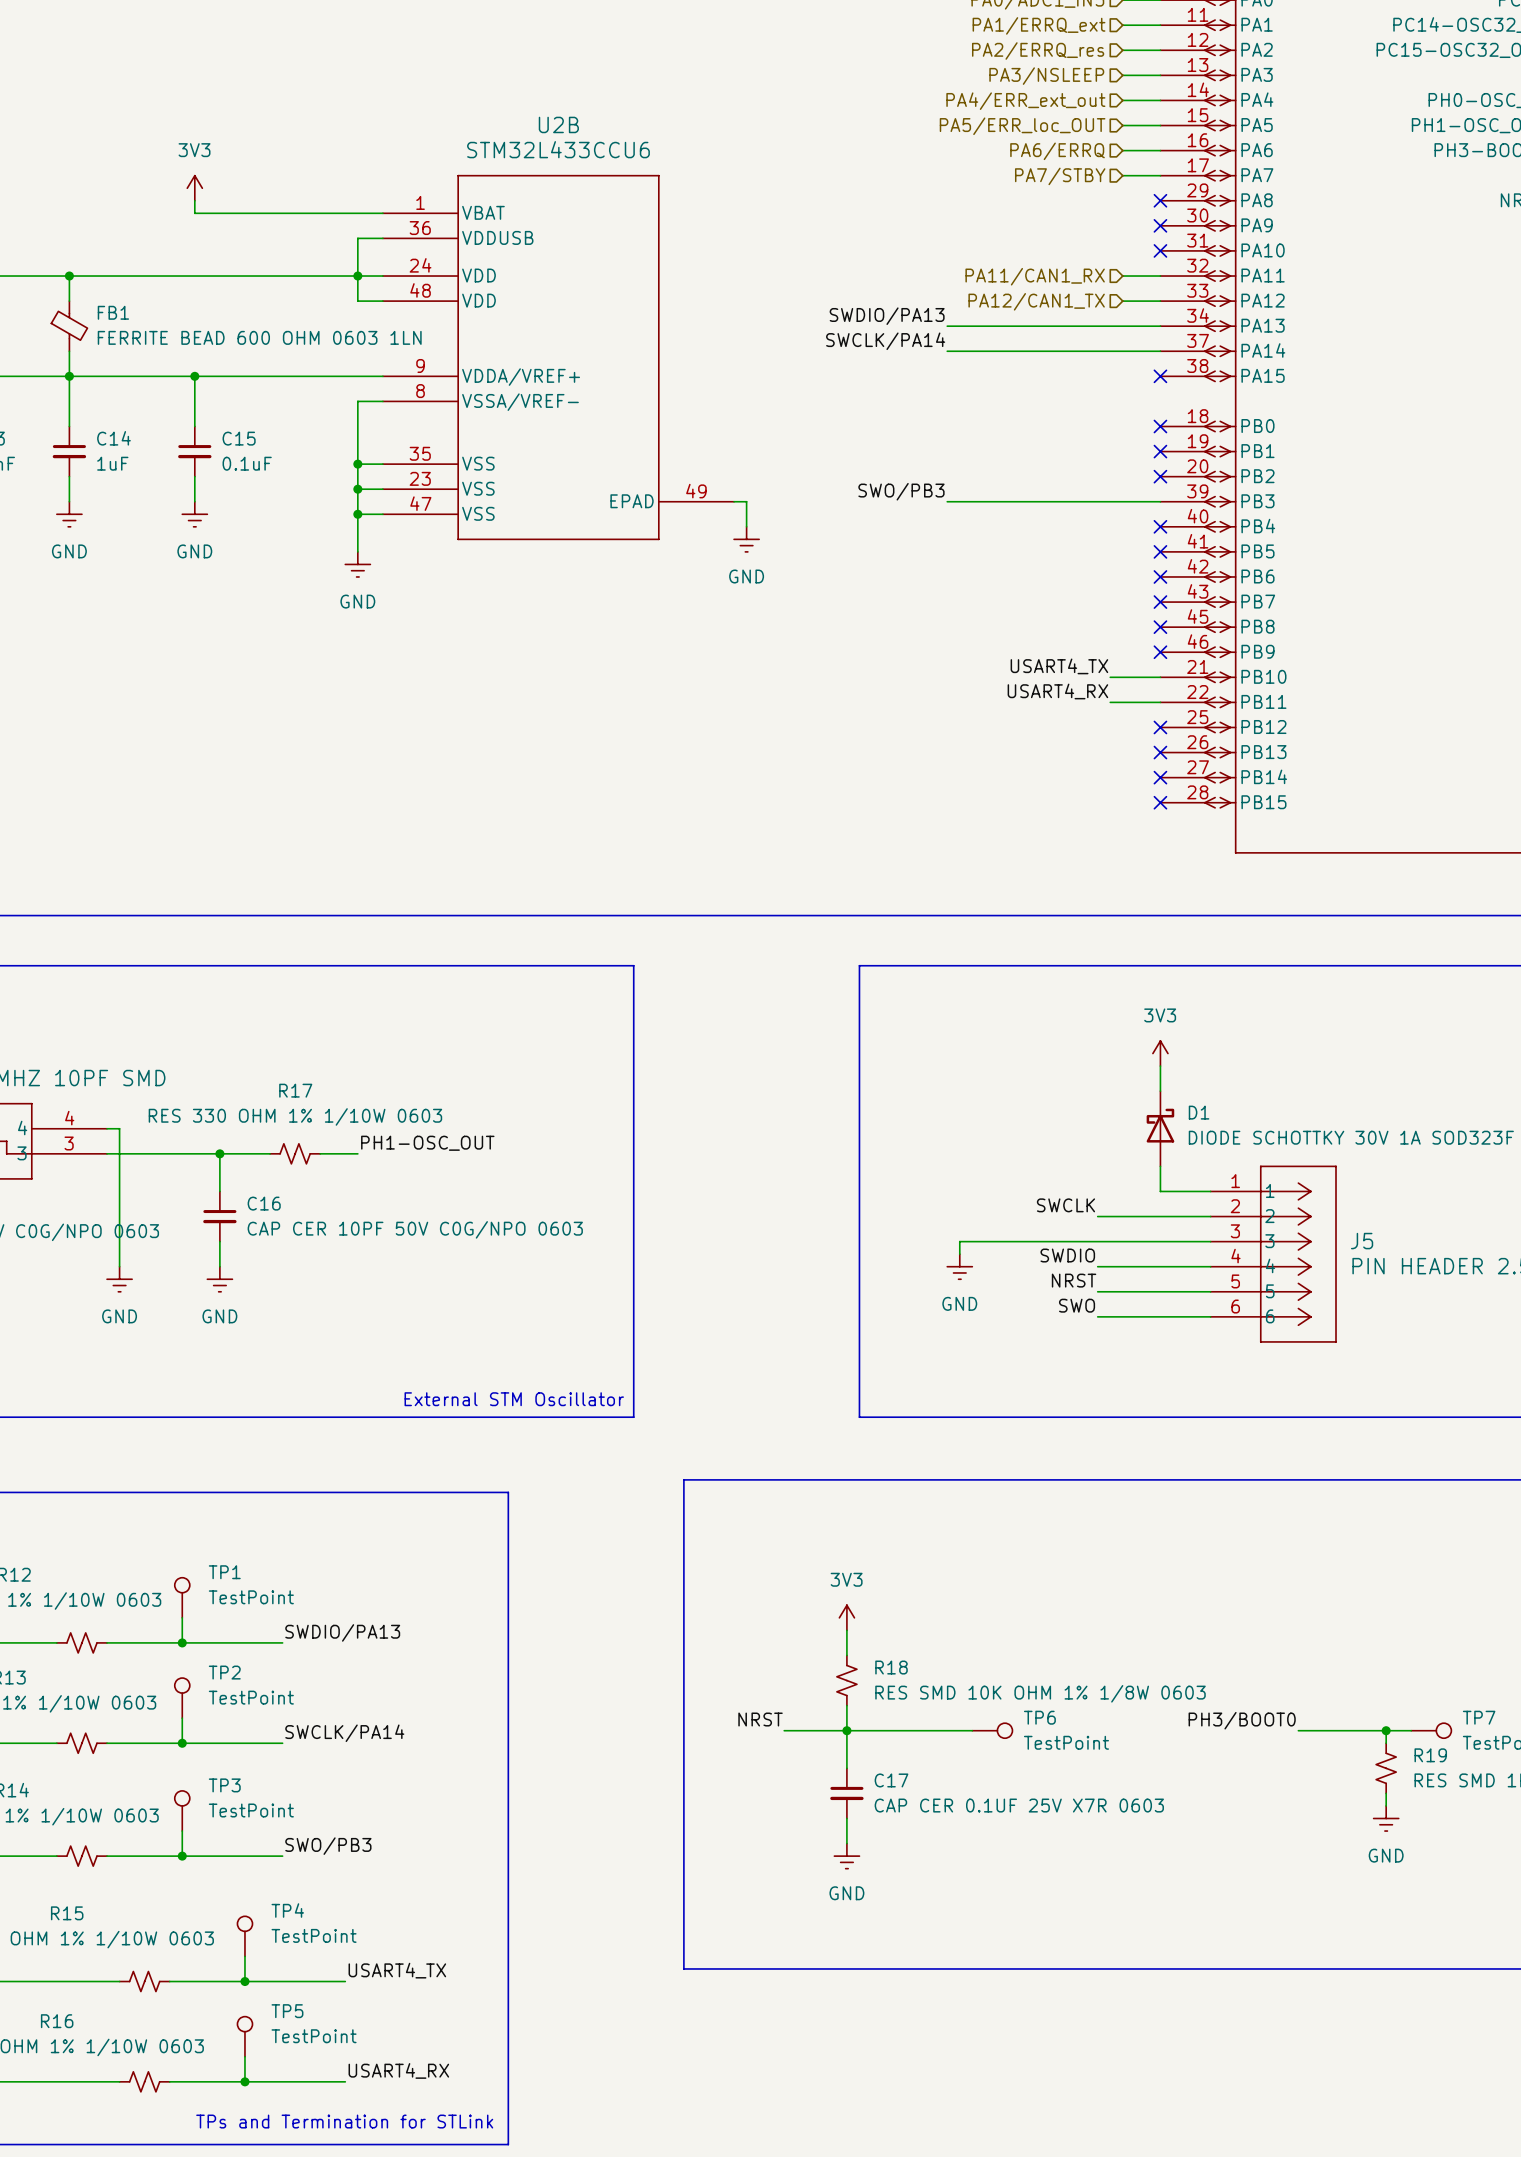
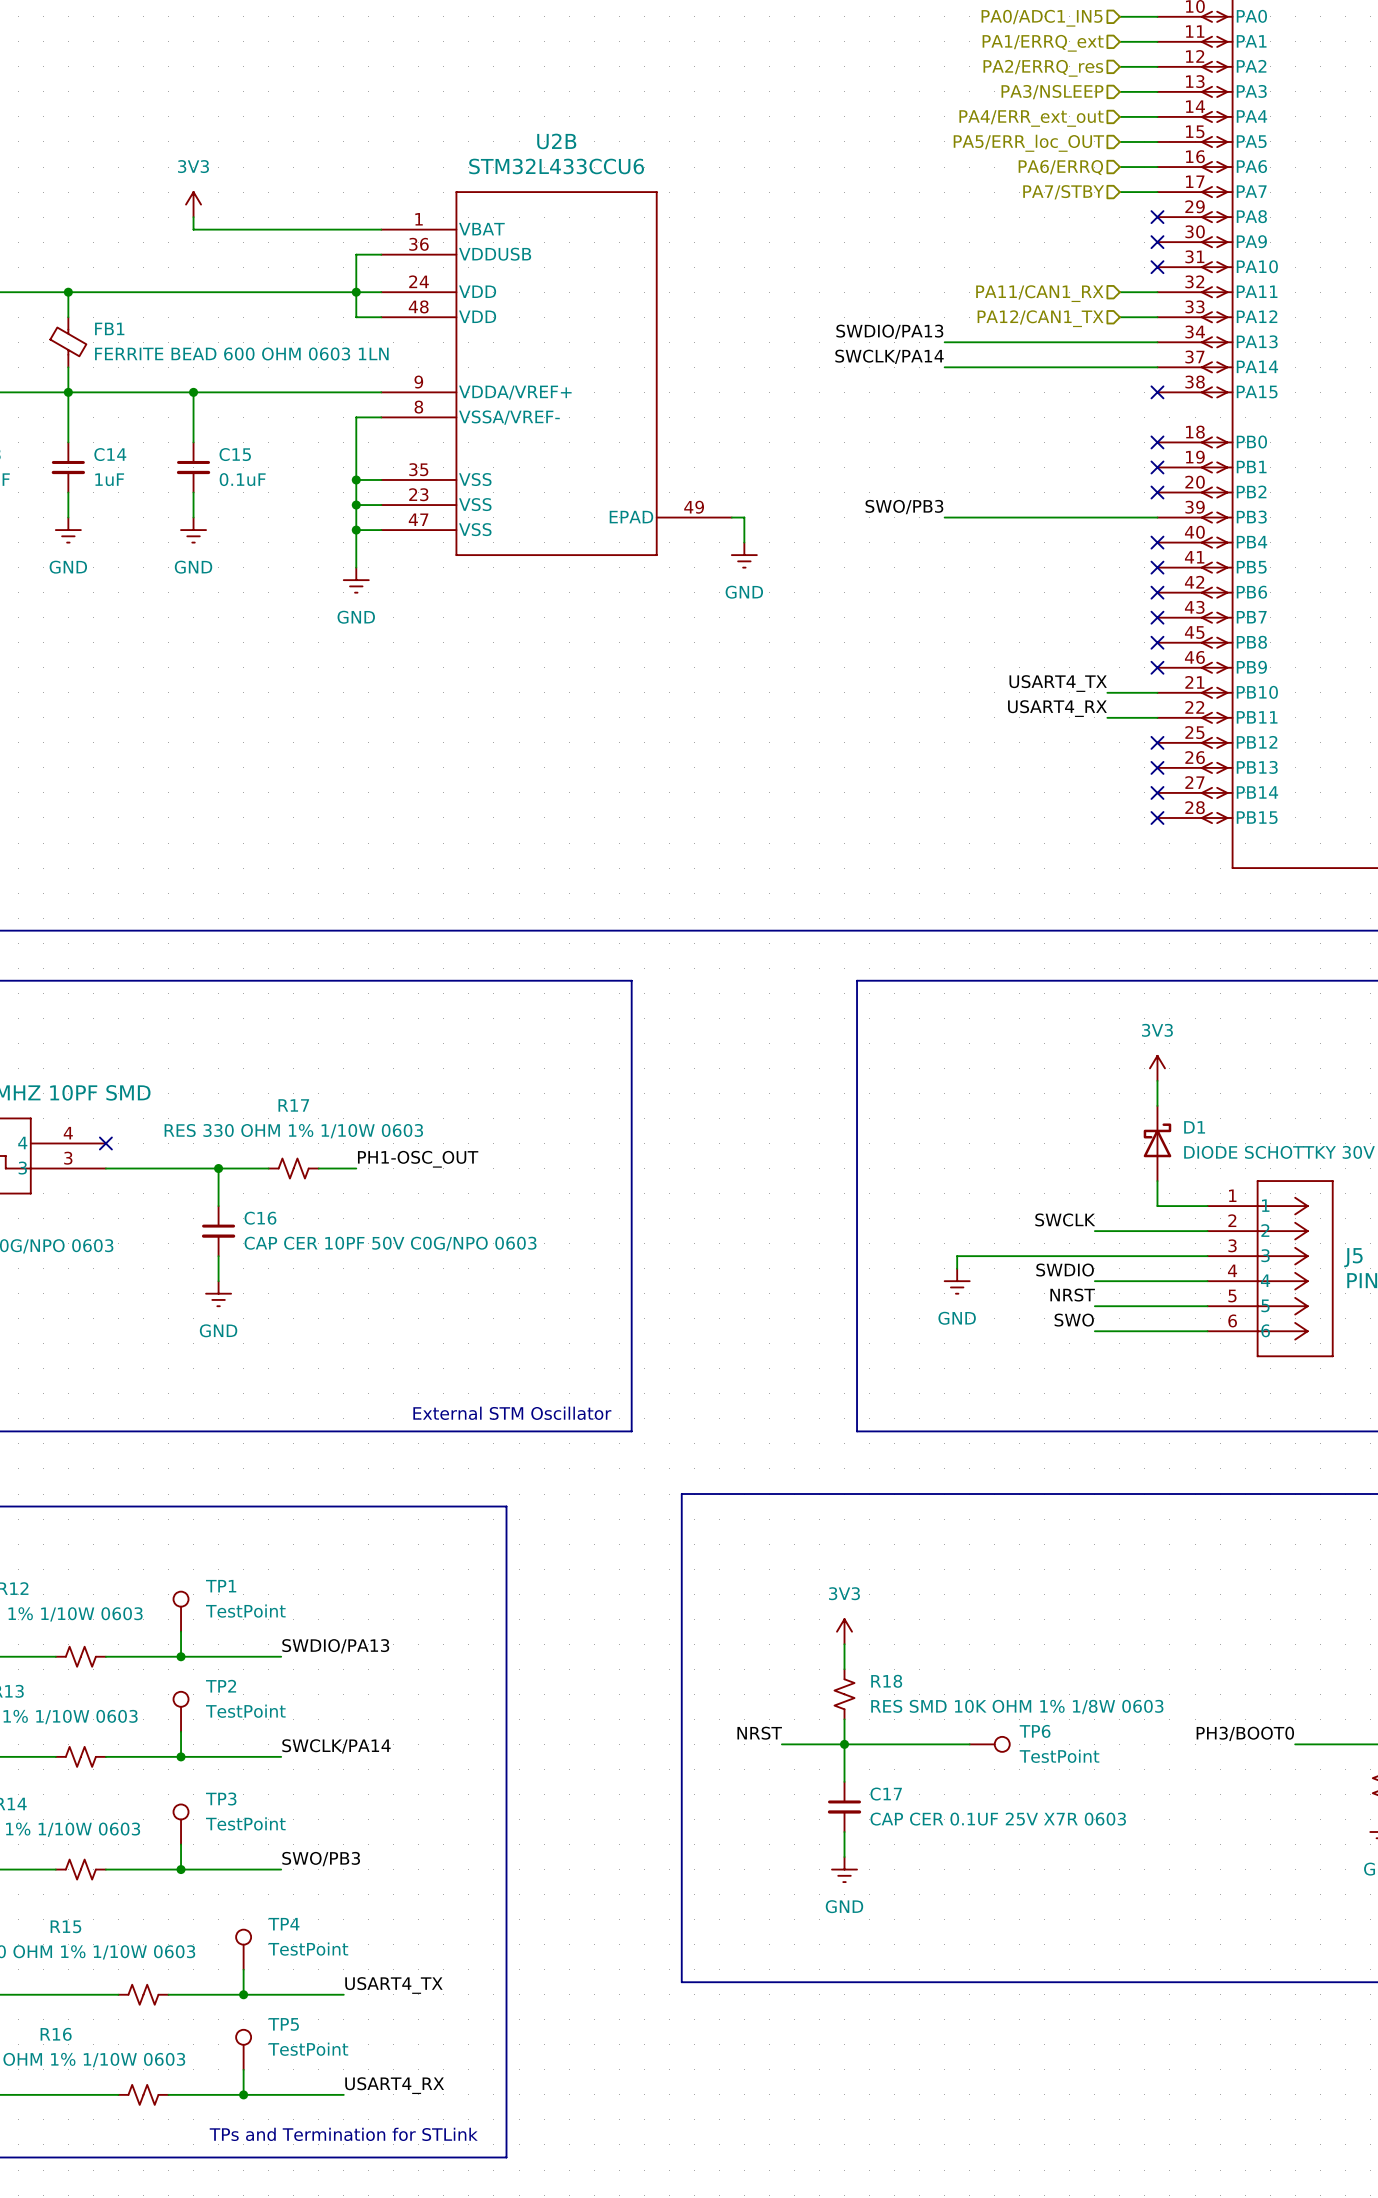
wire: (107, 1128) (119, 1128) (119, 1266) -> none
no-connect mark: none -> (105, 1143)
power symbol: GND (119, 1279) -> none

